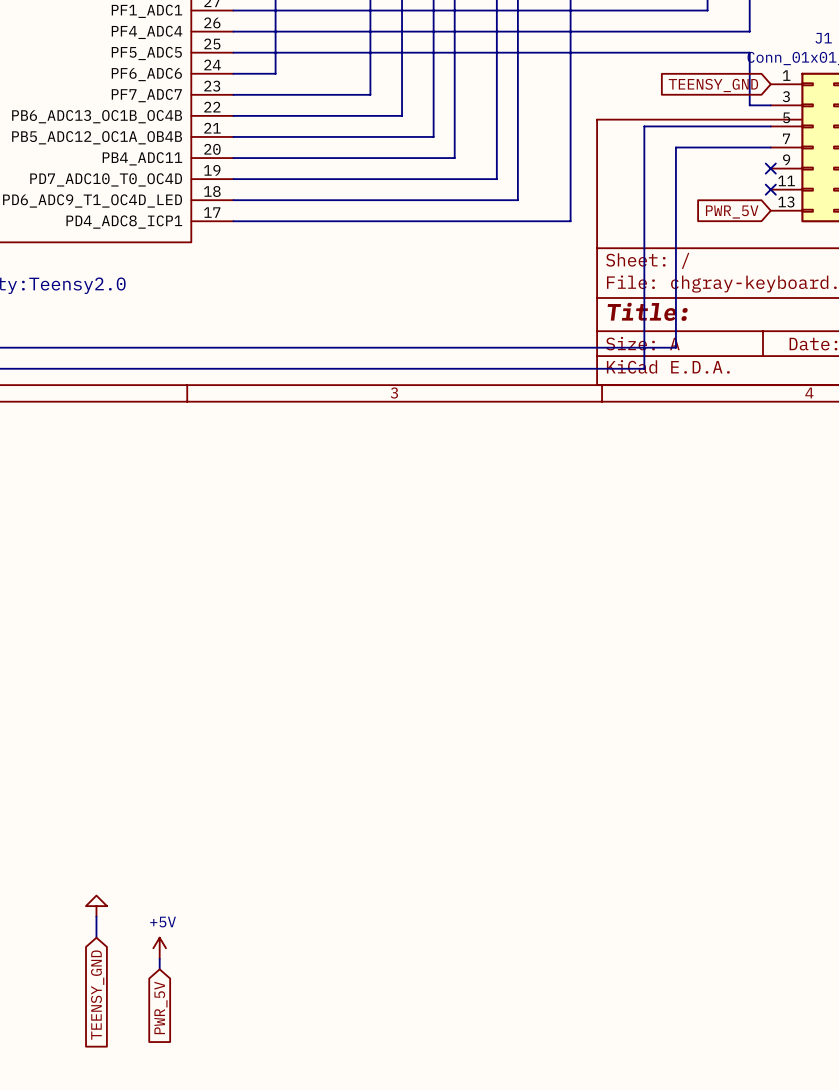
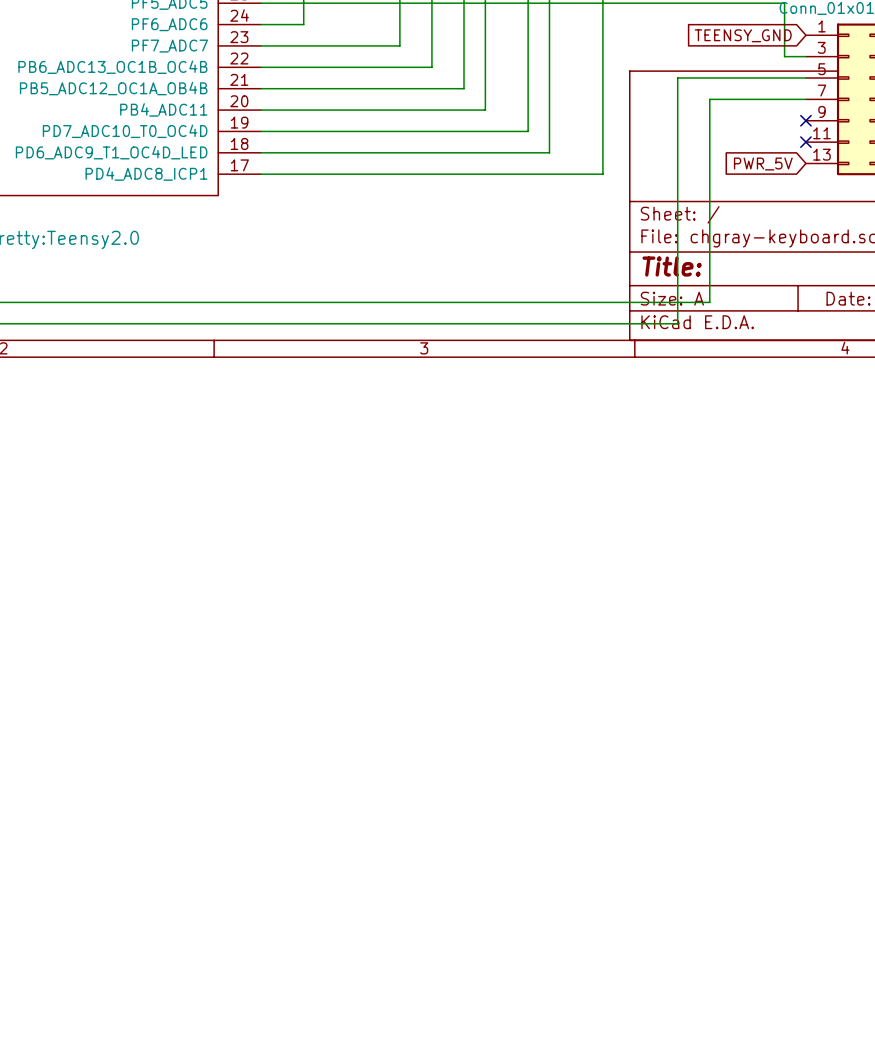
power symbol: (96, 906) -> none
wire: (96, 916) (96, 937) -> none
power symbol: +5V (159, 948) -> none
wire: (159, 958) (159, 969) -> none
global label: TEENSY_GND (97, 995) -> none
global label: PWR_5V (160, 1007) -> none

